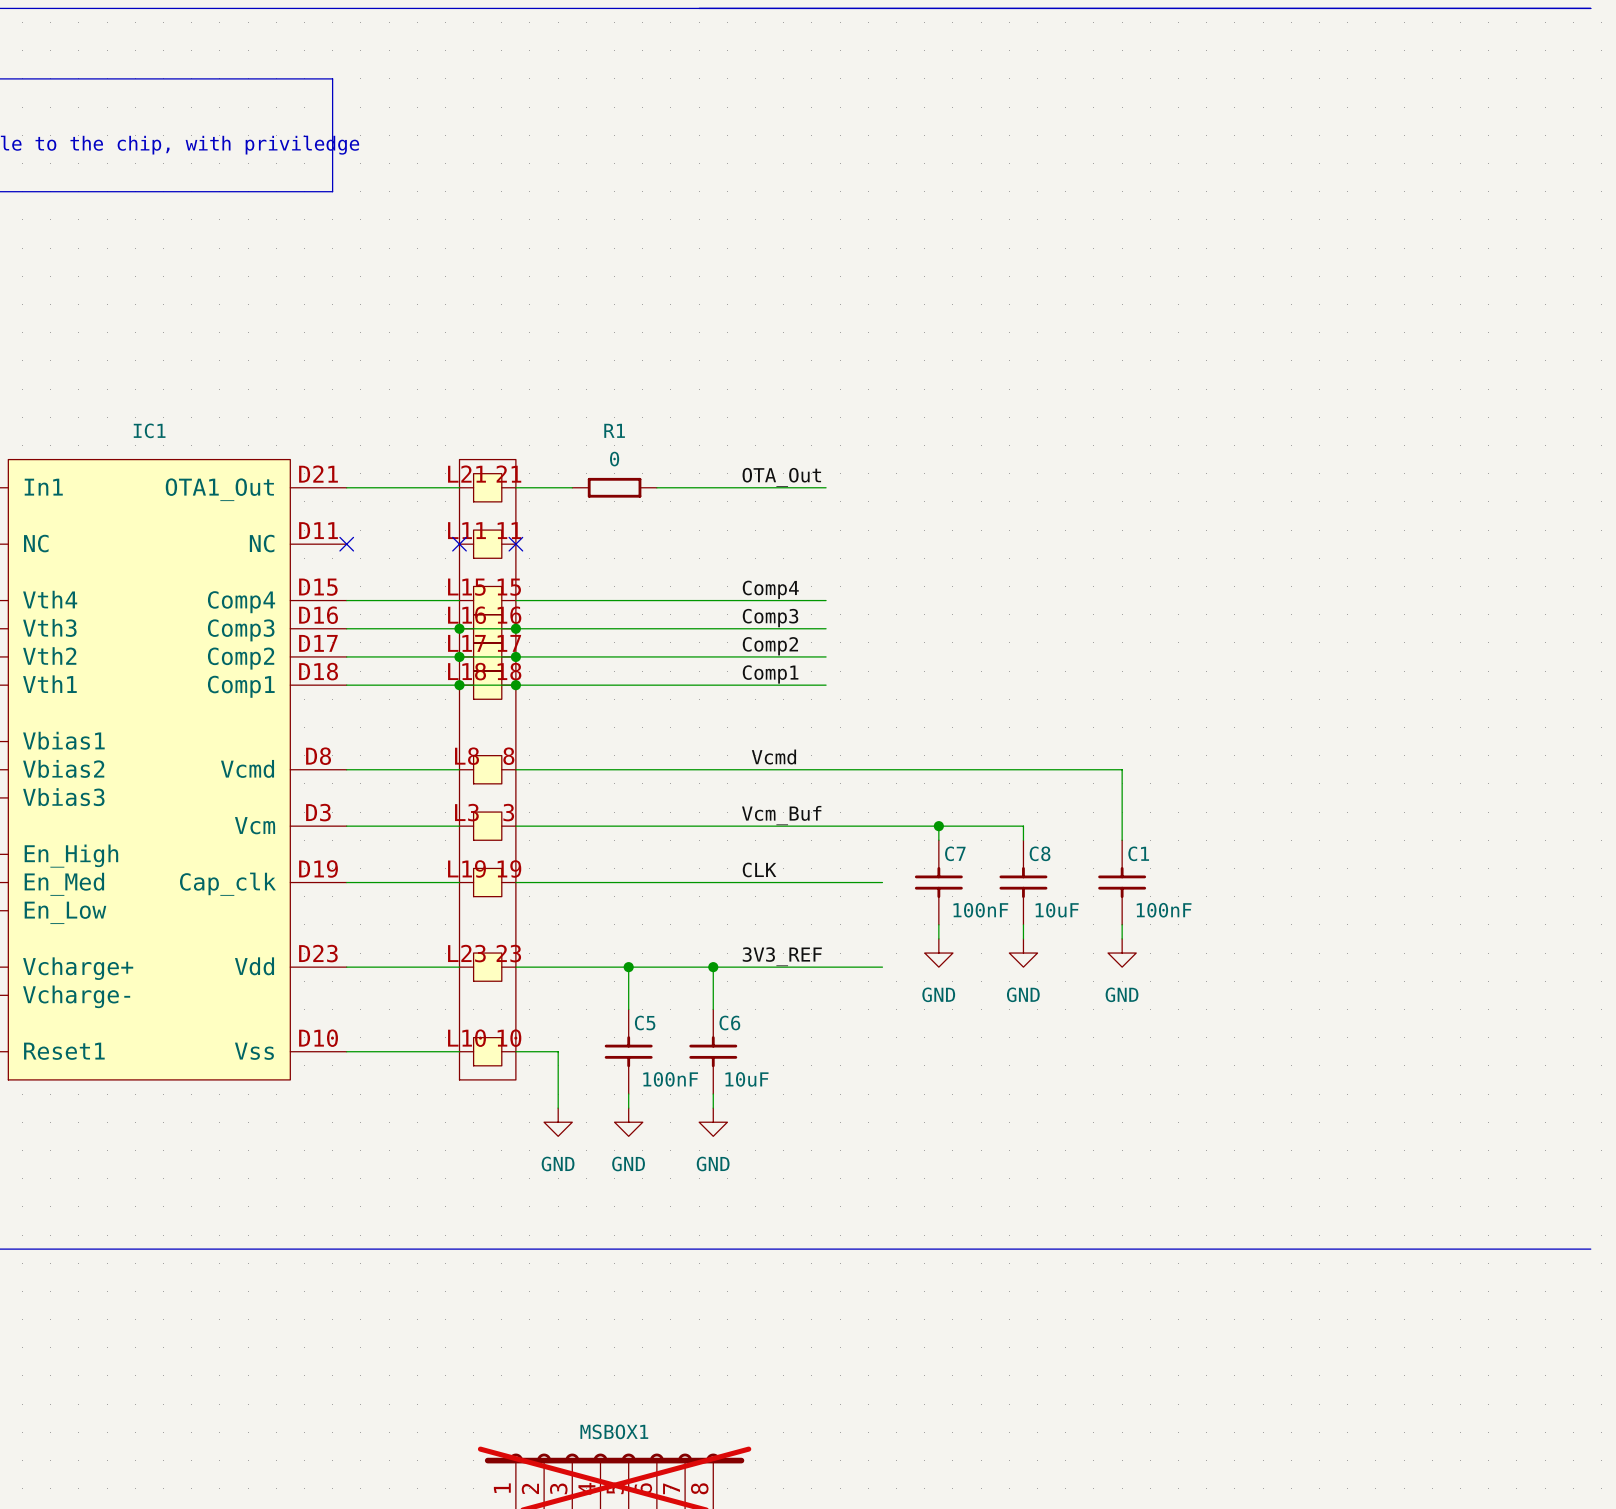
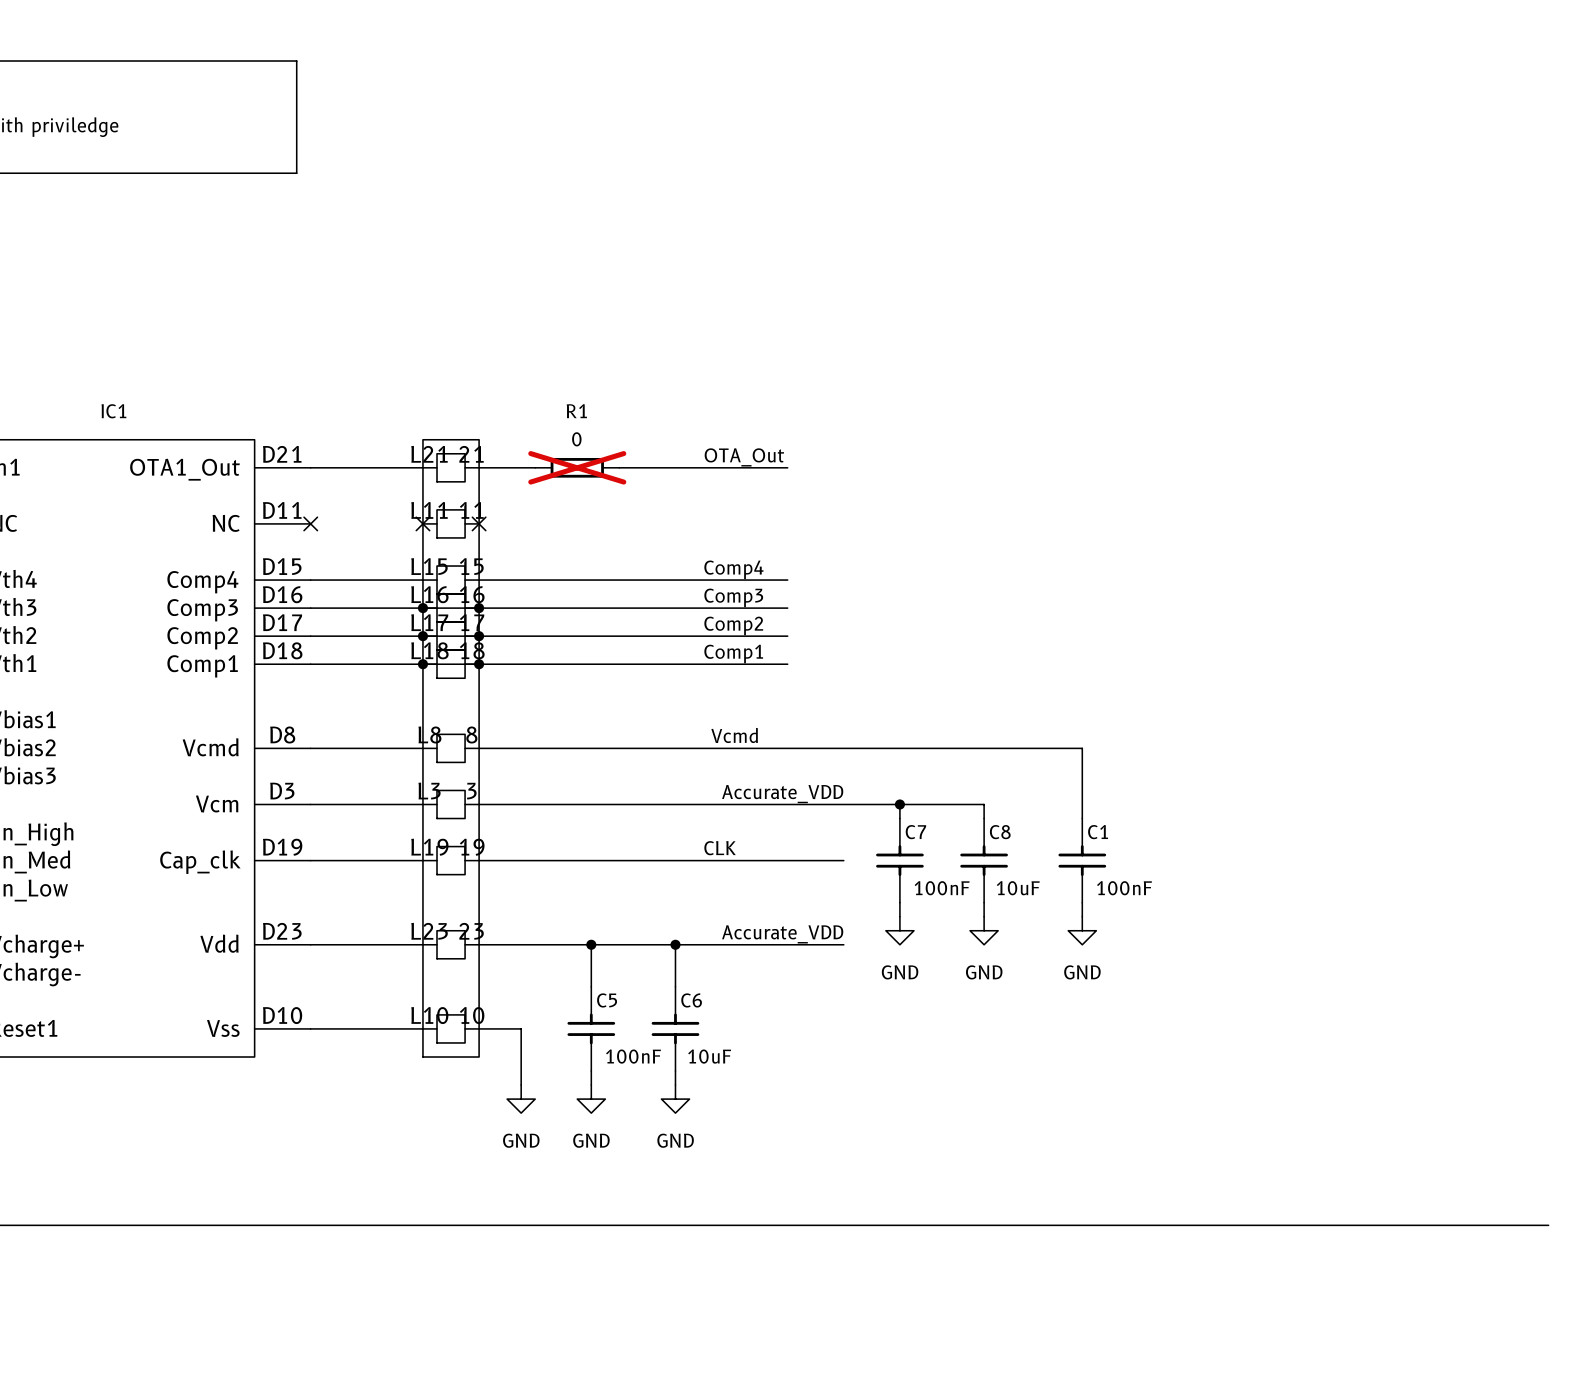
R1 do-not-place cross: none -> (577, 467)
label: Vcm_Buf (781, 815) -> none
label: none -> Accurate_VDD (782, 794)
label: 3V3_REF (782, 956) -> none
label: none -> Accurate_VDD (782, 934)

